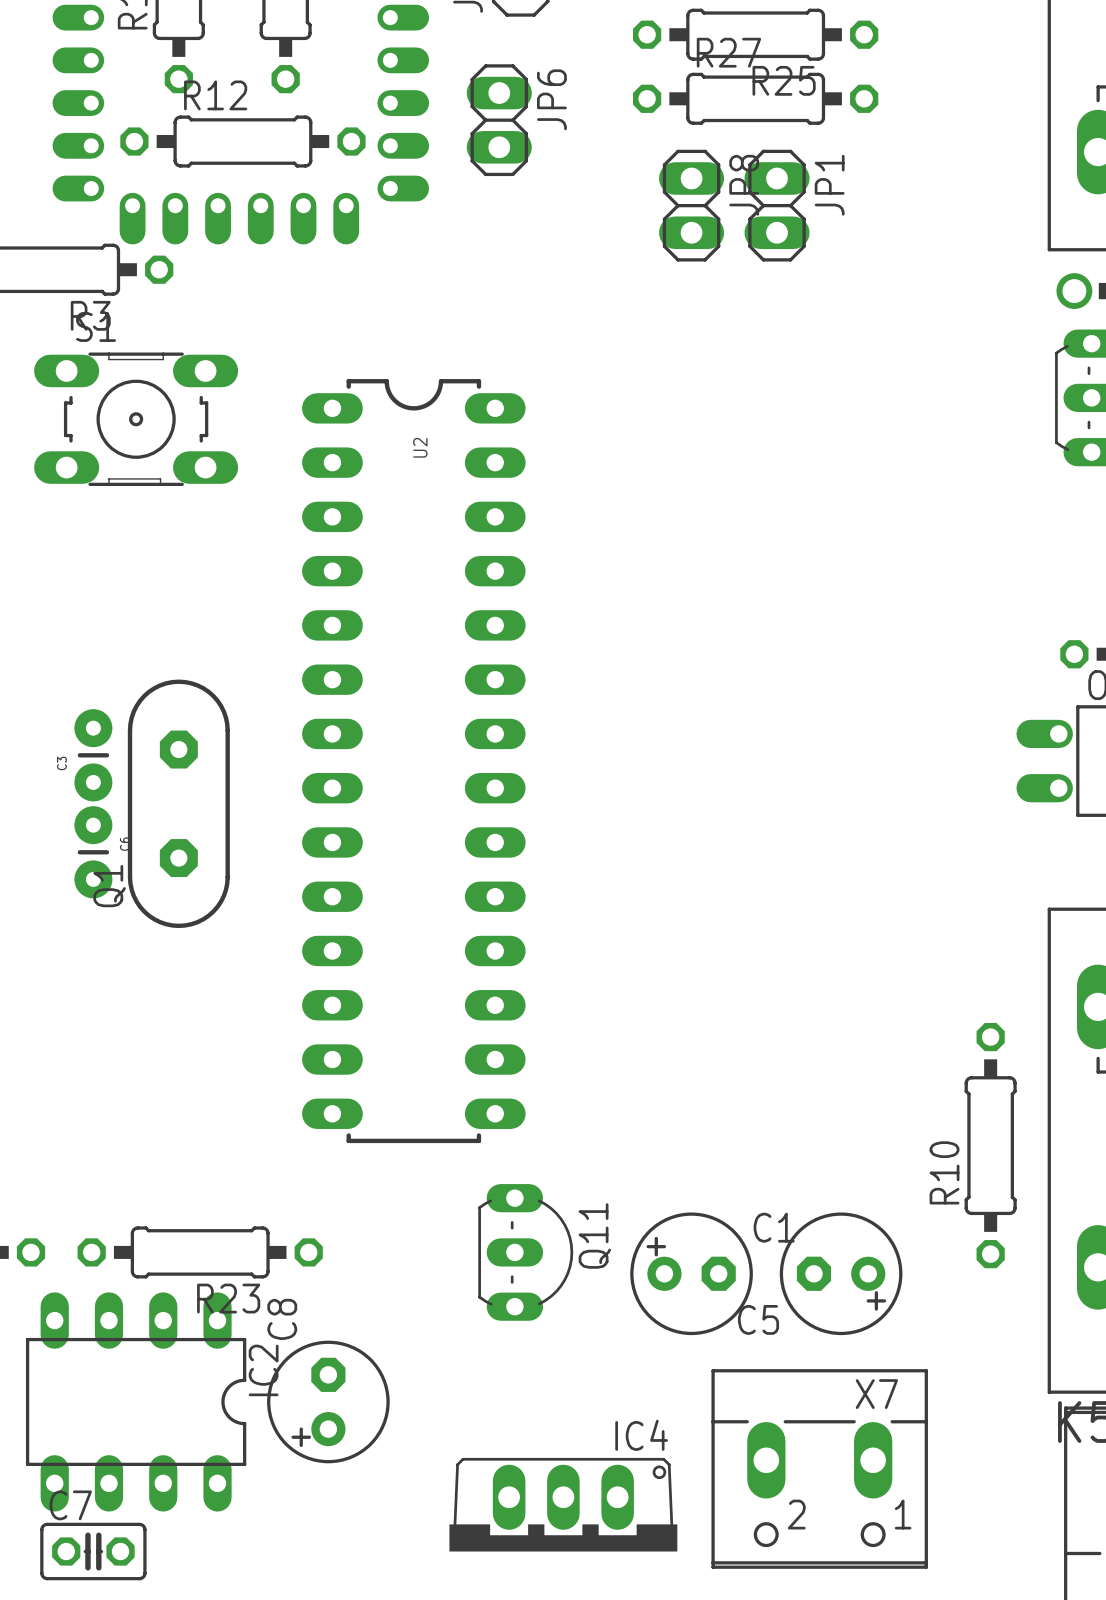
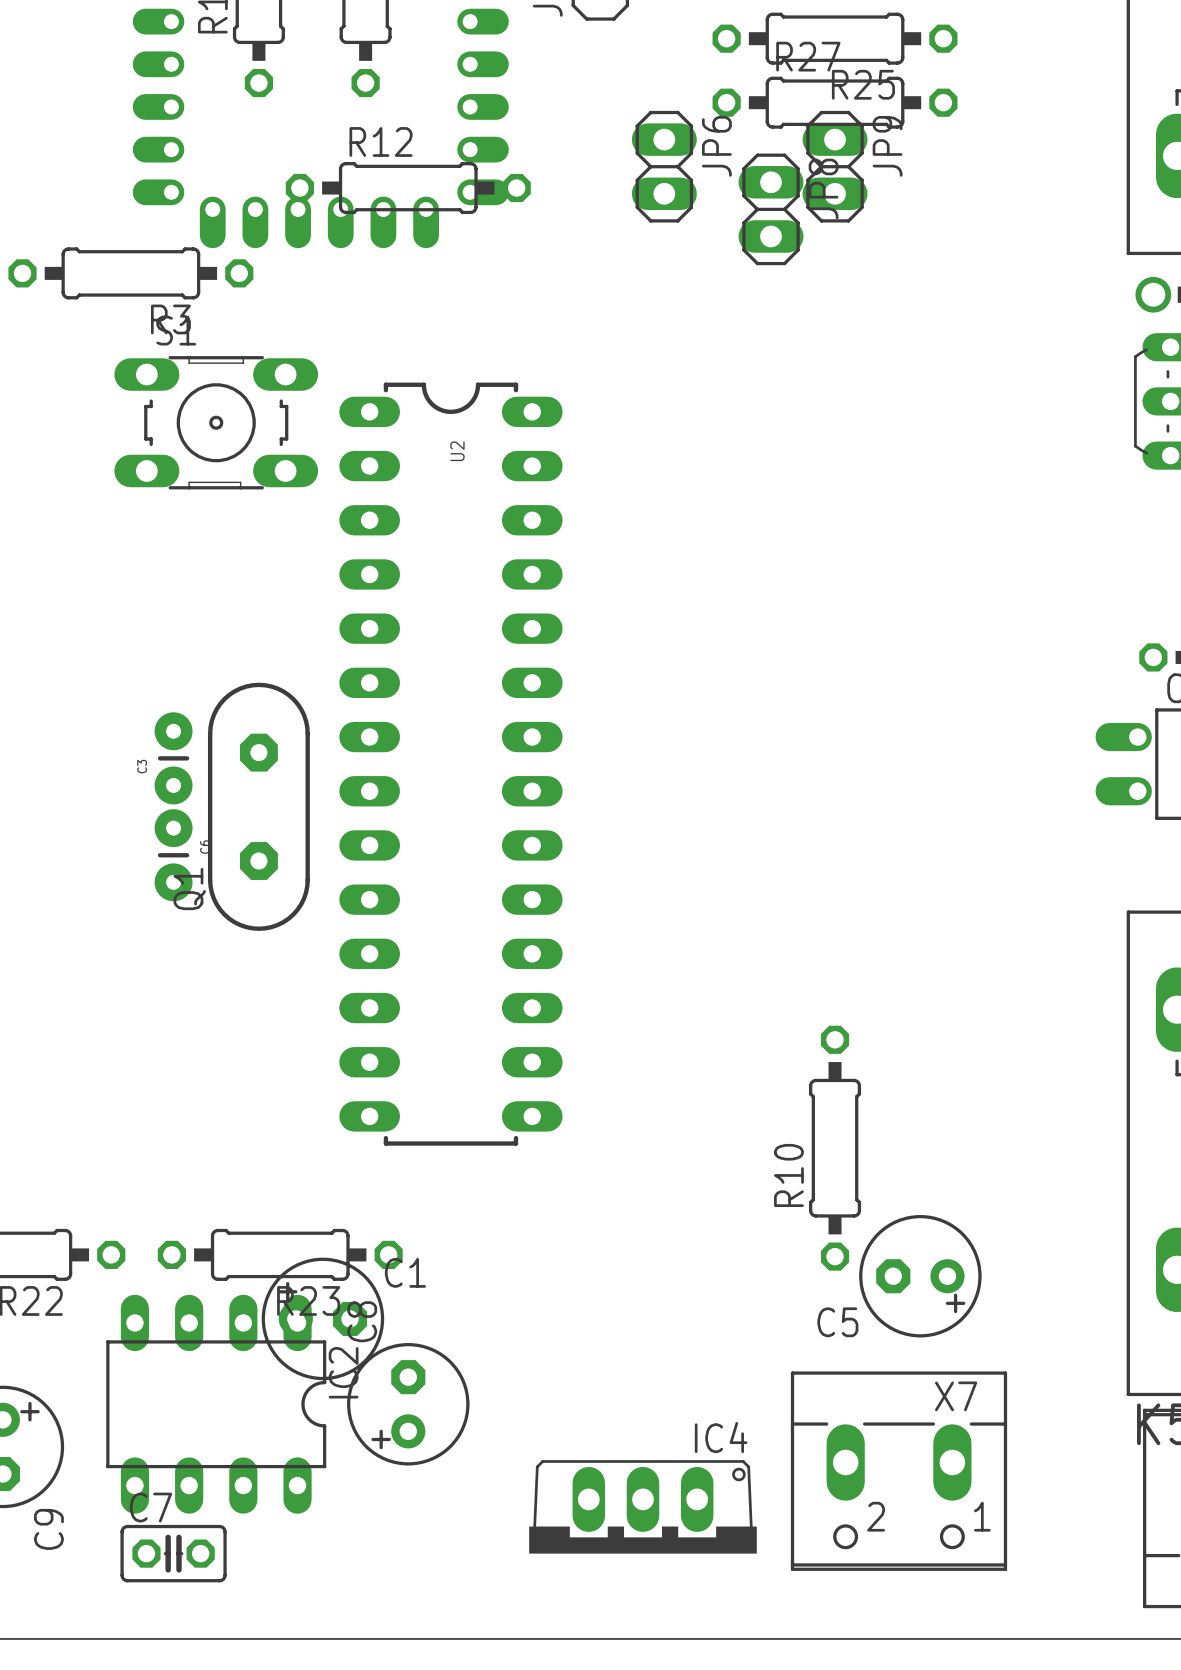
JP6 position: (499, 120) -> (664, 166)
R12 position: (242, 141) -> (408, 188)
JP9: none -> (835, 166)
JP1: (777, 205) -> none
U2 position: (413, 761) -> (450, 764)
R10 position: (990, 1145) -> (835, 1148)
Q11: (525, 1252) -> none
C1 position: (691, 1273) -> (322, 1318)

